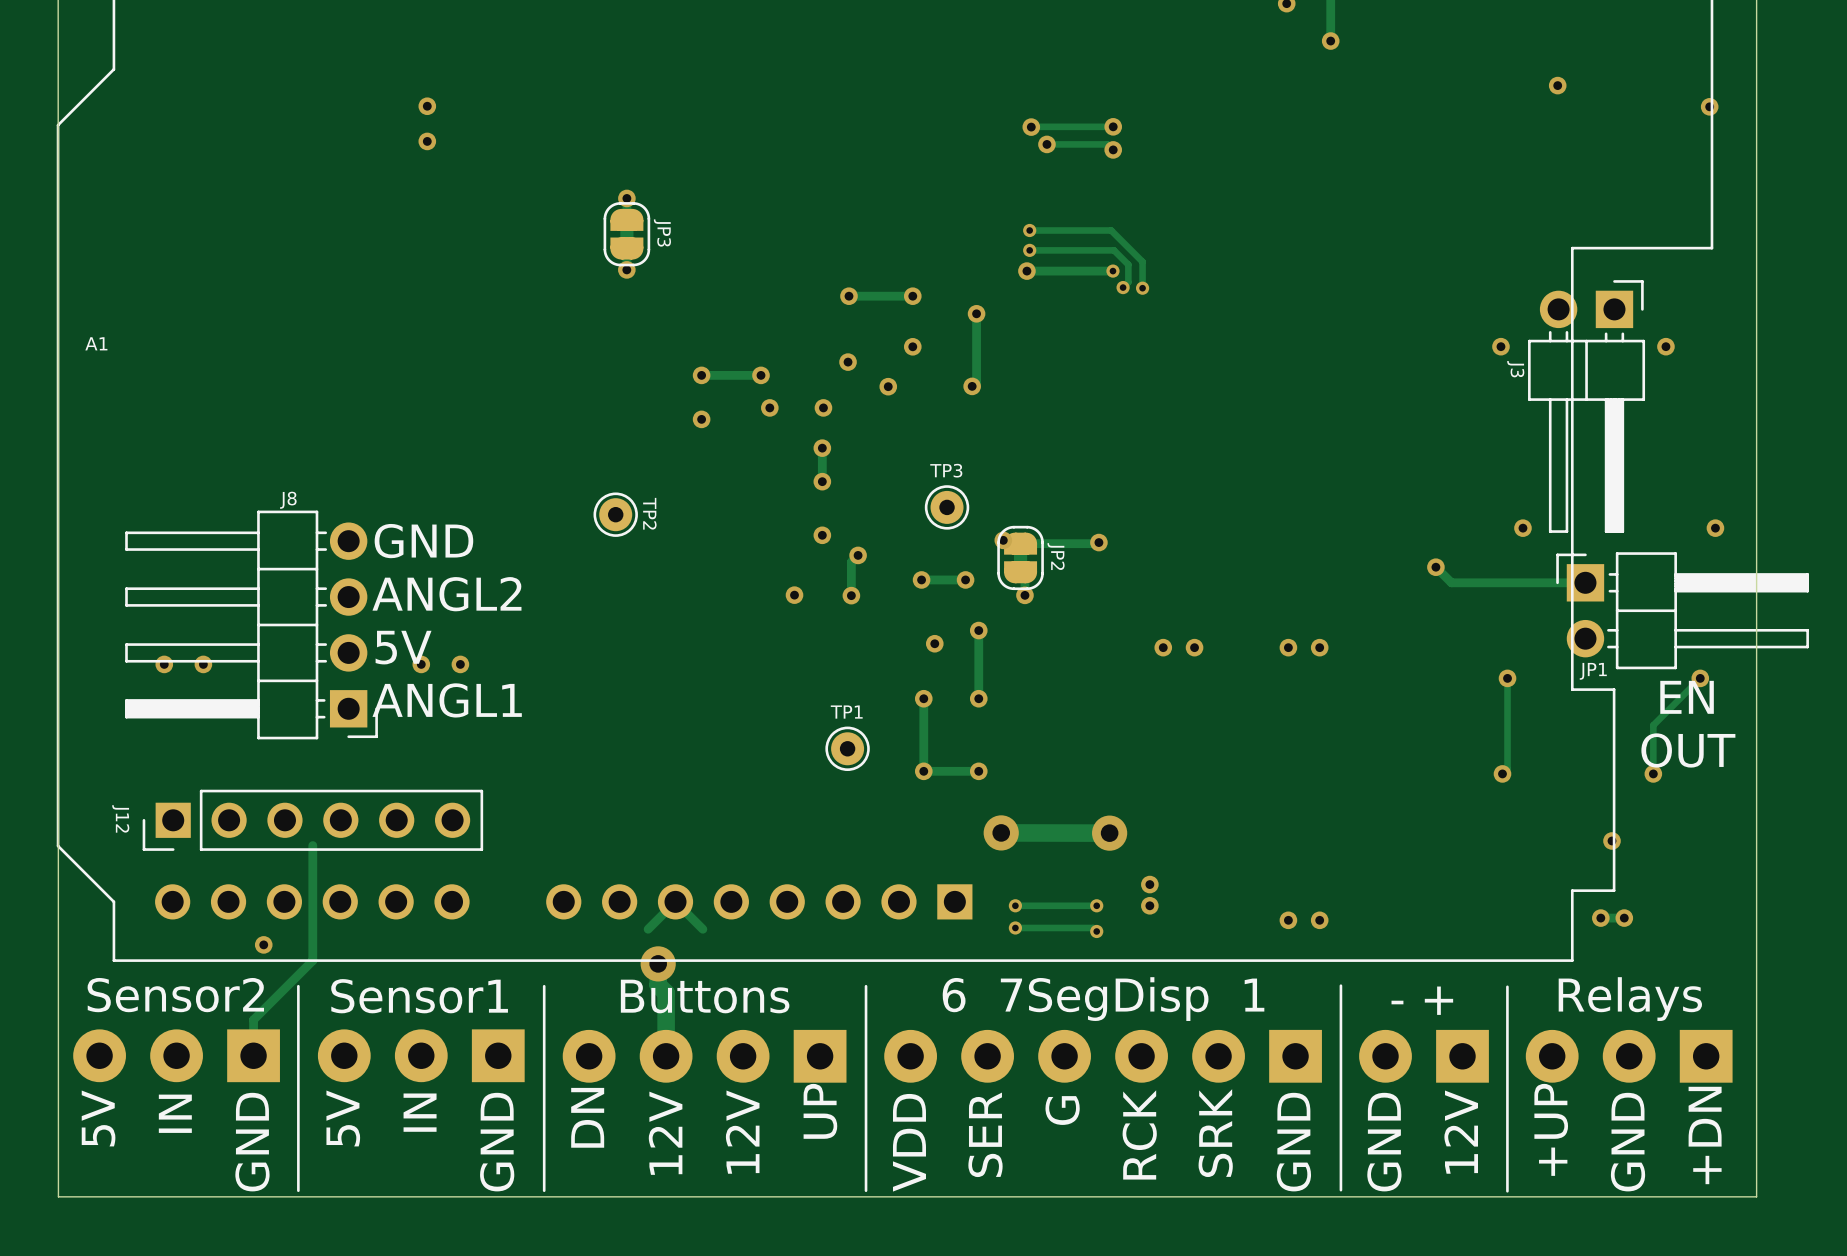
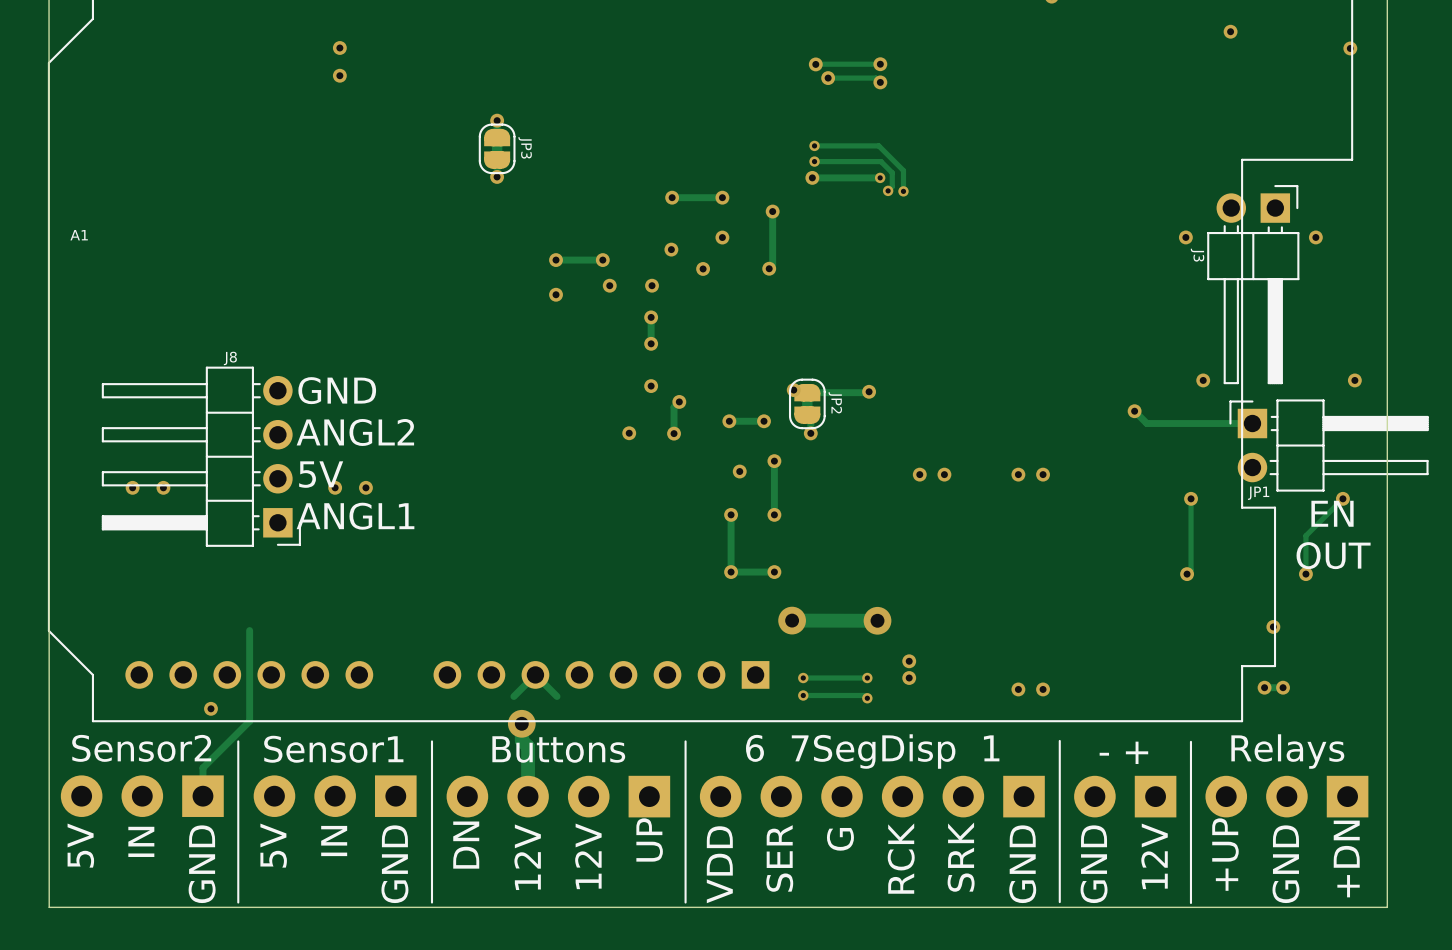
TP3: (947, 507) -> none
TP2: (615, 514) -> none
TP1: (847, 748) -> none
J12: (312, 820) -> none

